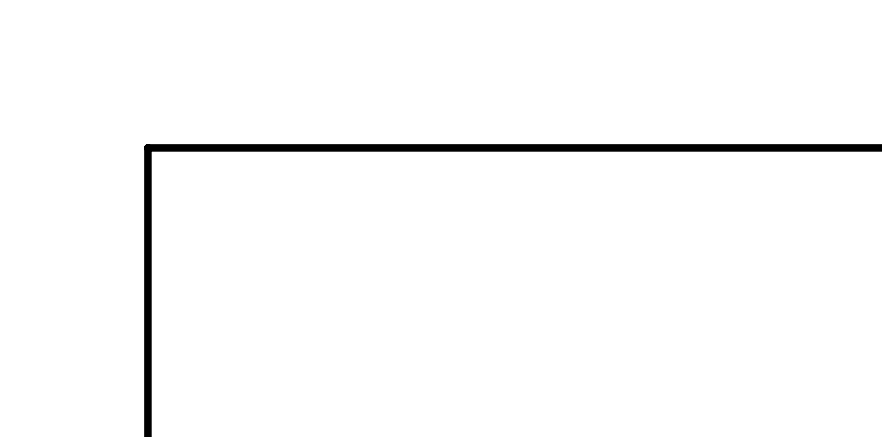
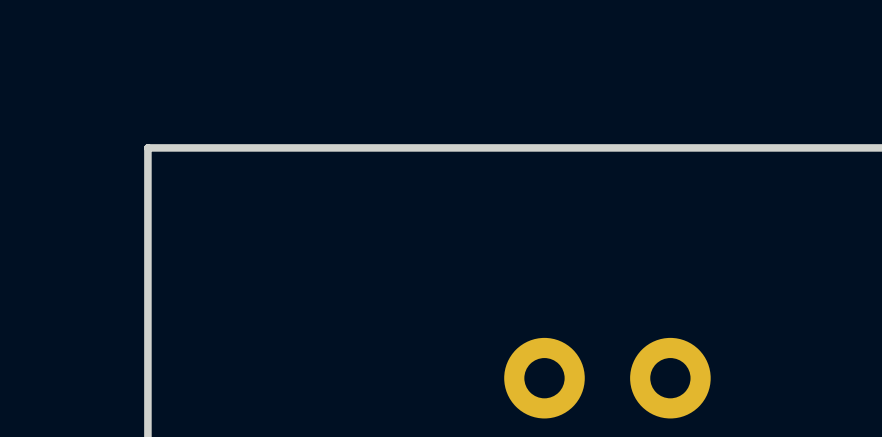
part: none -> (607, 378)

